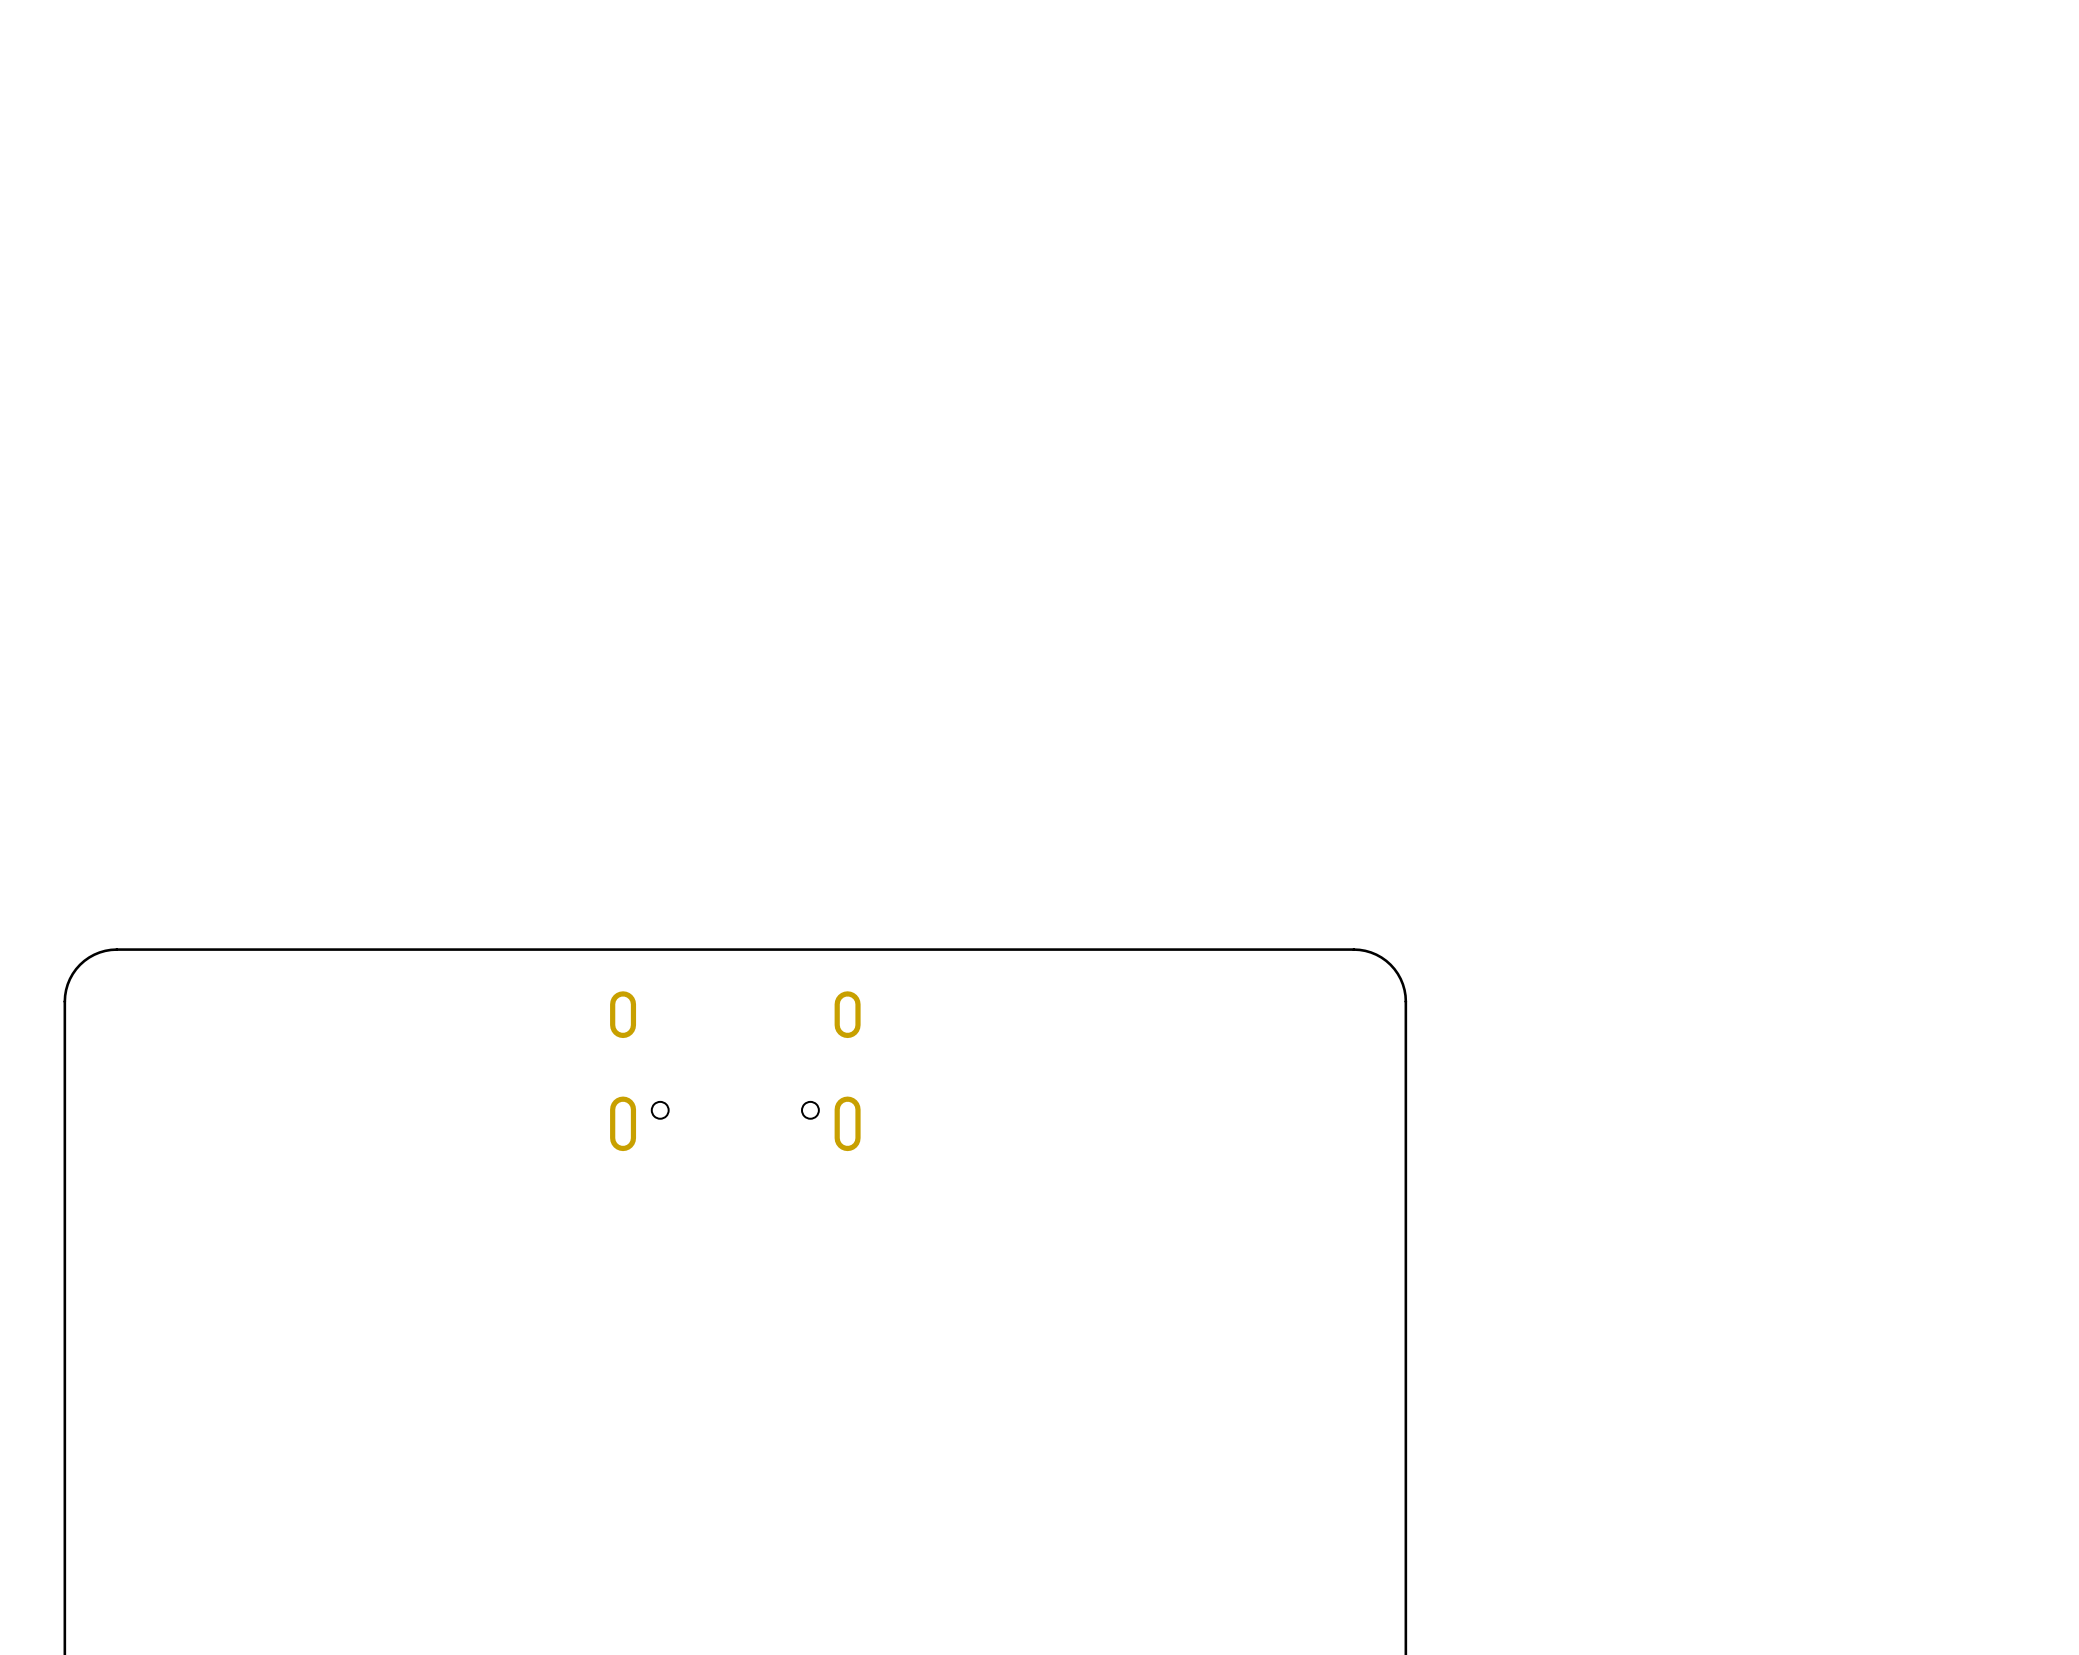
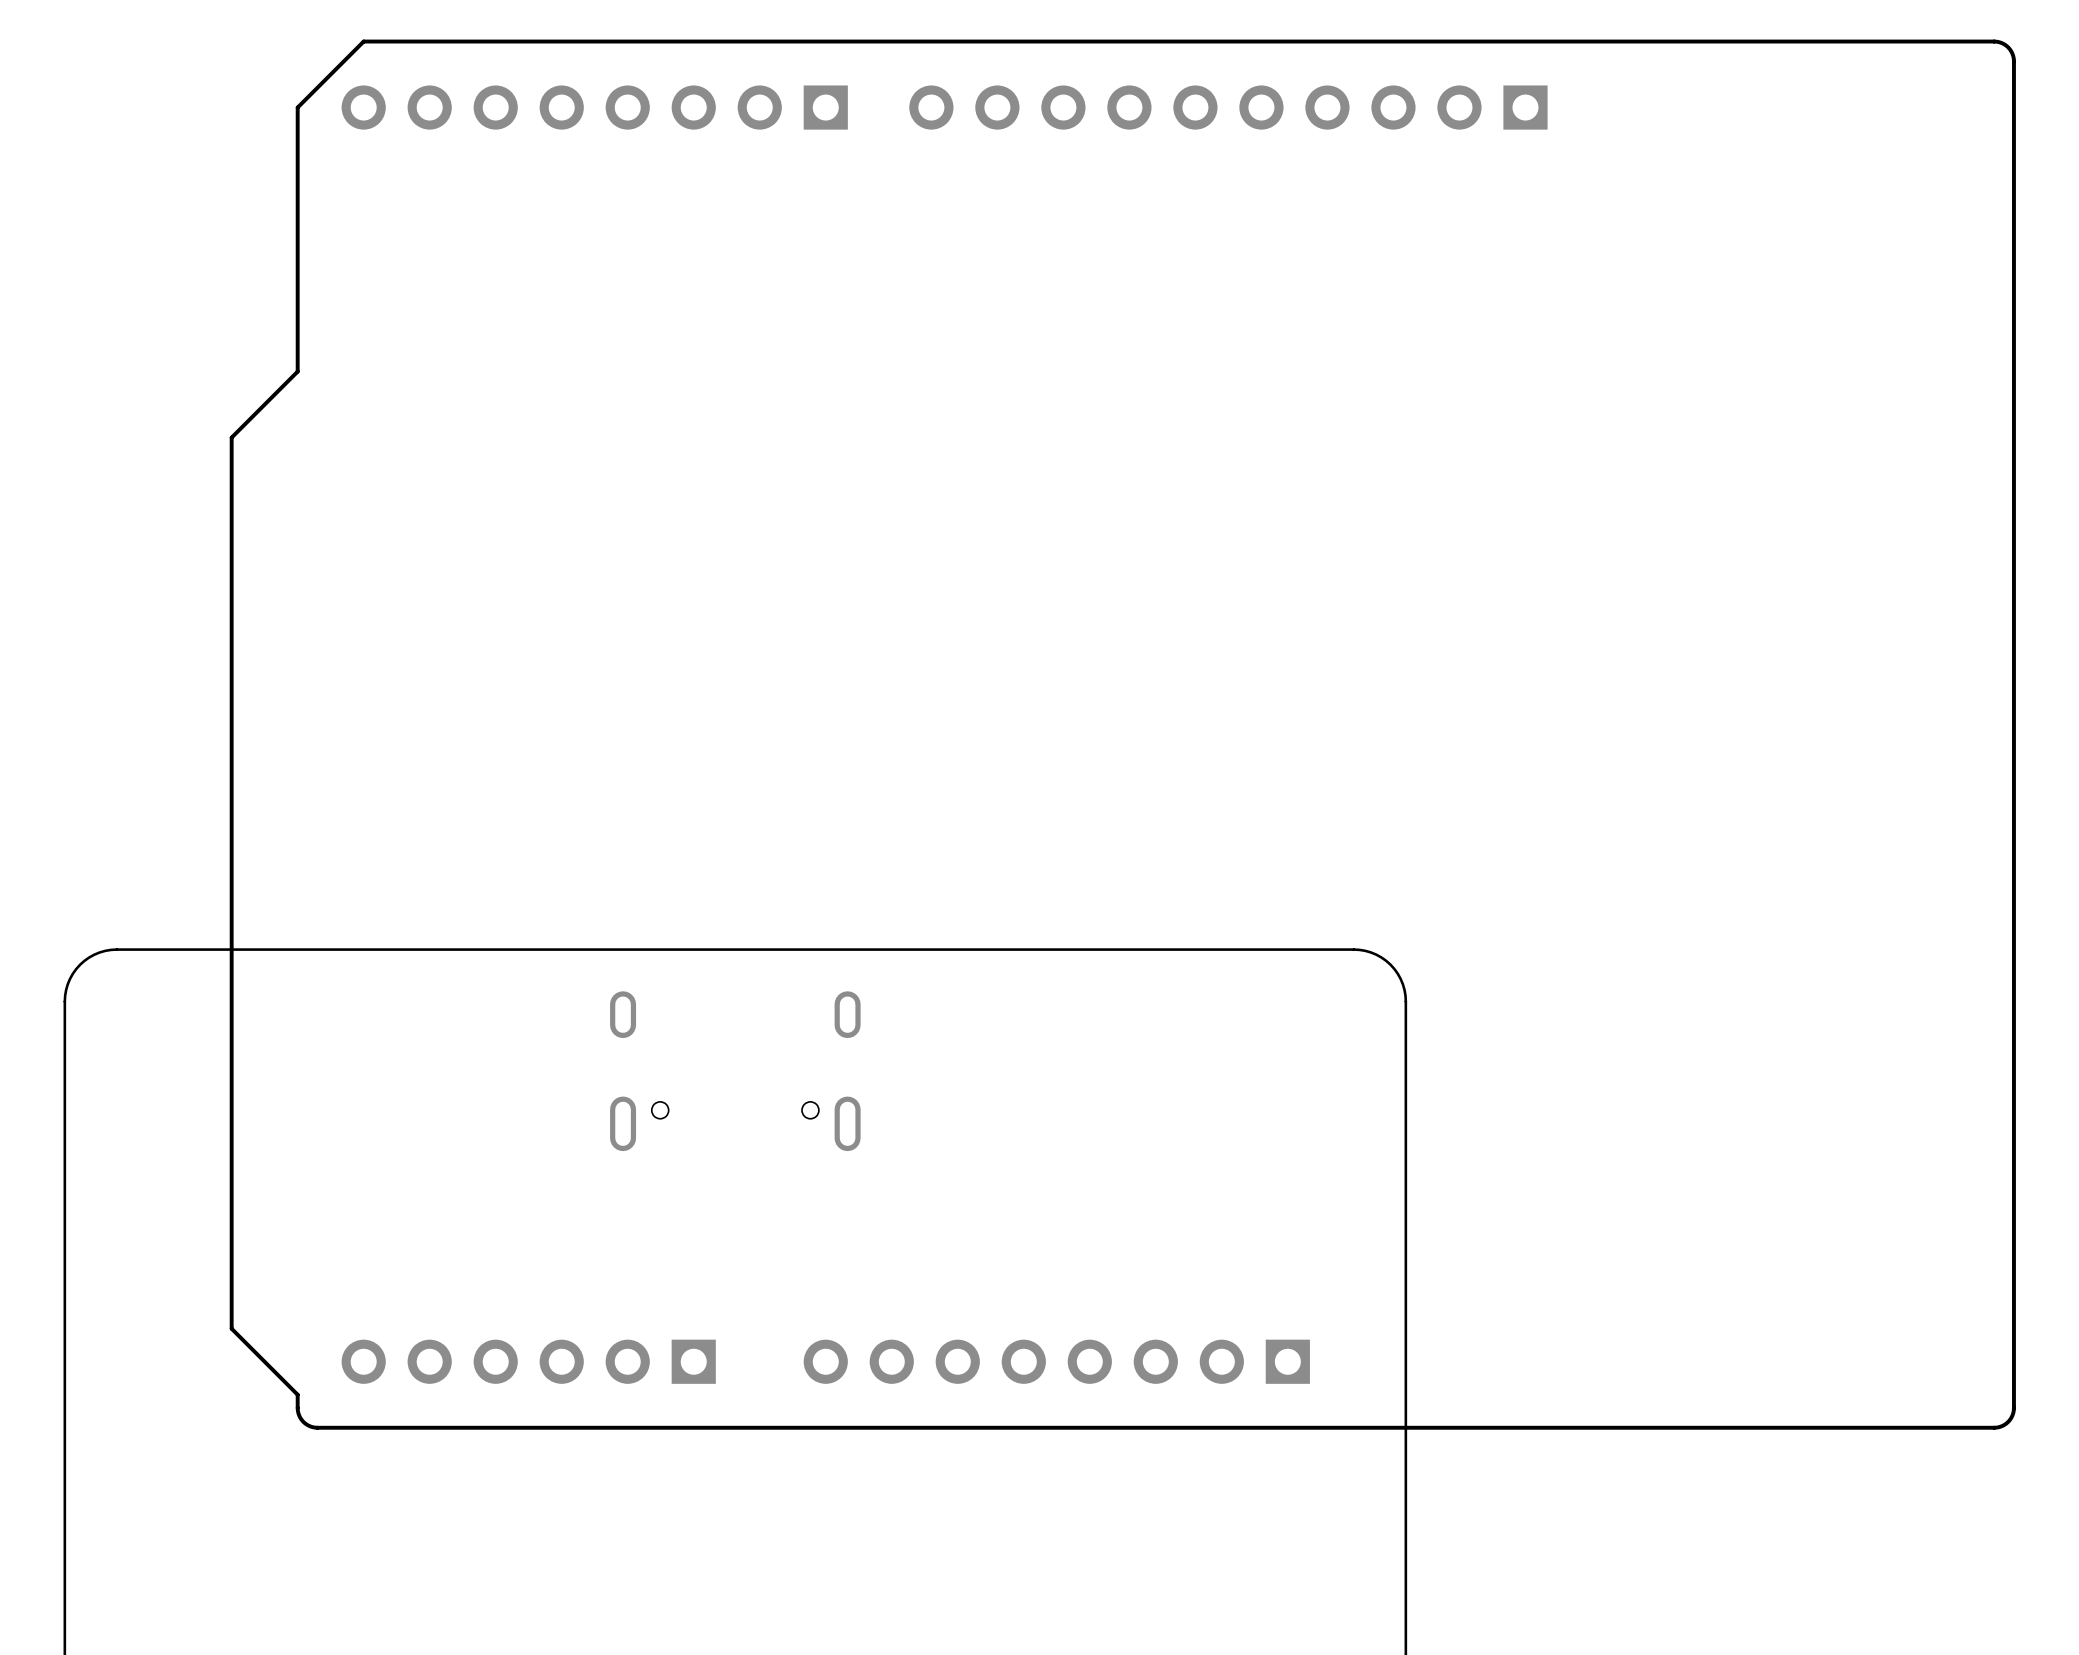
board edge: none -> (1994, 41) (363, 41) (297, 107) (297, 371) (231, 437) (231, 1328) (297, 1394) (297, 1410) (301, 1420) (307, 1425) (317, 1427) (1994, 1427) (2006, 1423) (2011, 1417) (2013, 1407) (2013, 61) (2012, 53) (2008, 47) (2001, 43) (1994, 41)
part: none -> (594, 107)
part: none -> (1228, 107)
part: none -> (528, 1361)
part: none -> (1056, 1361)

